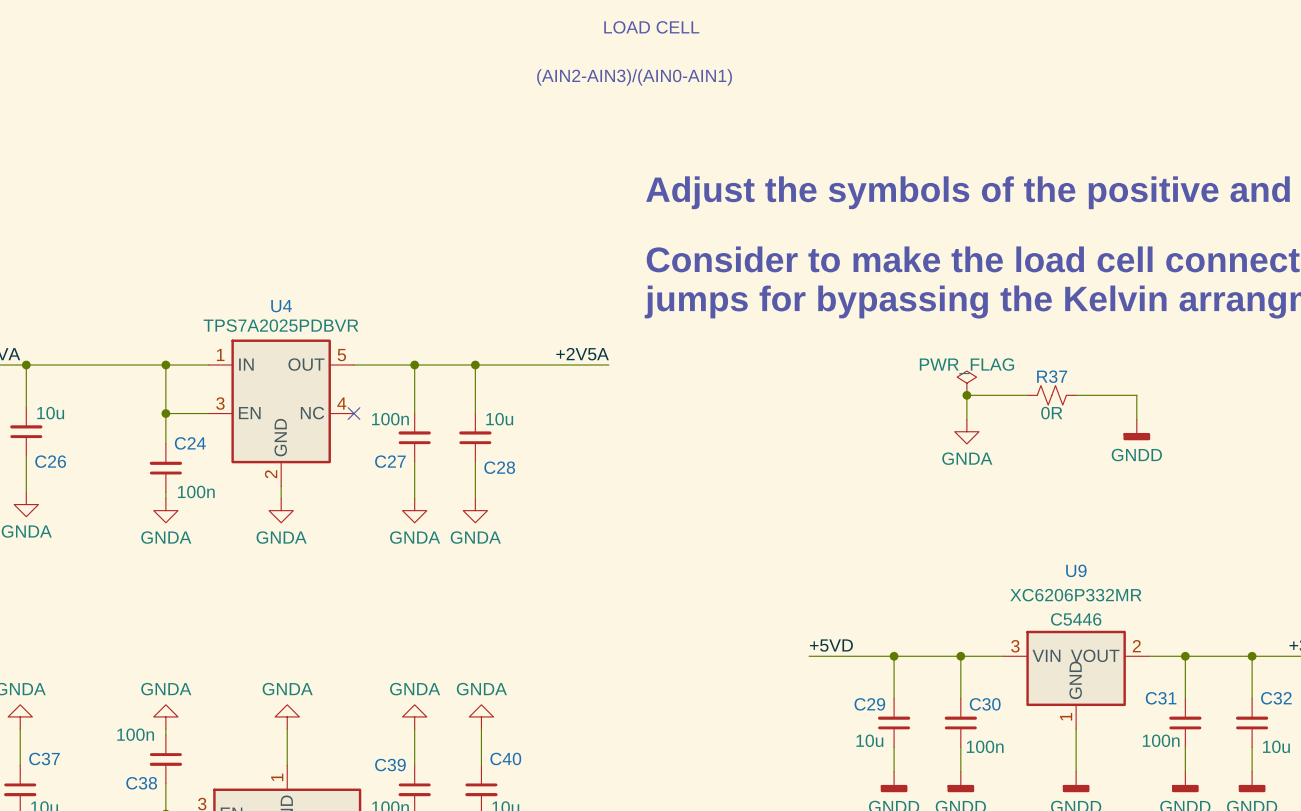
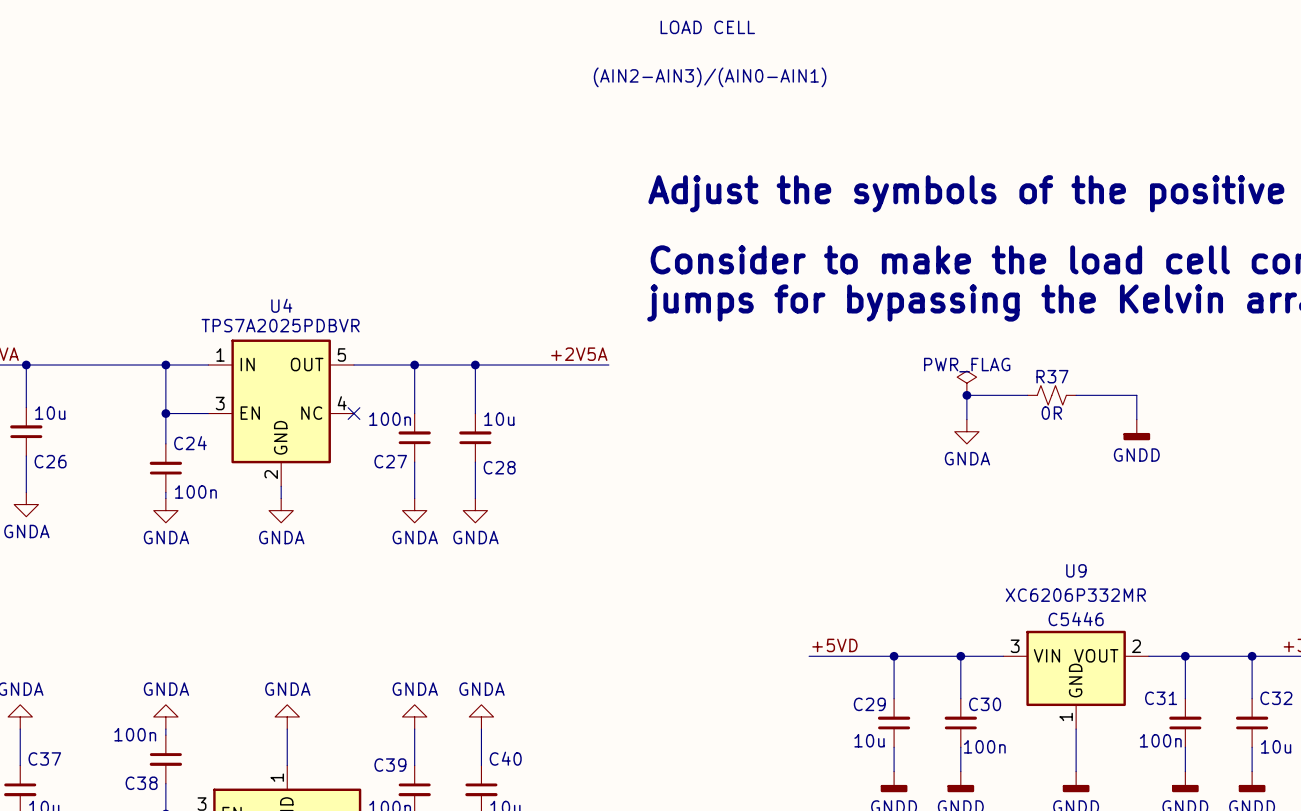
text position: LOAD CELL (651, 27) -> LOAD CELL (707, 27)
text position: (AIN2-AIN3)/(AIN0-AIN1) (634, 77) -> (AIN2-AIN3)/(AIN0-AIN1) (710, 77)

